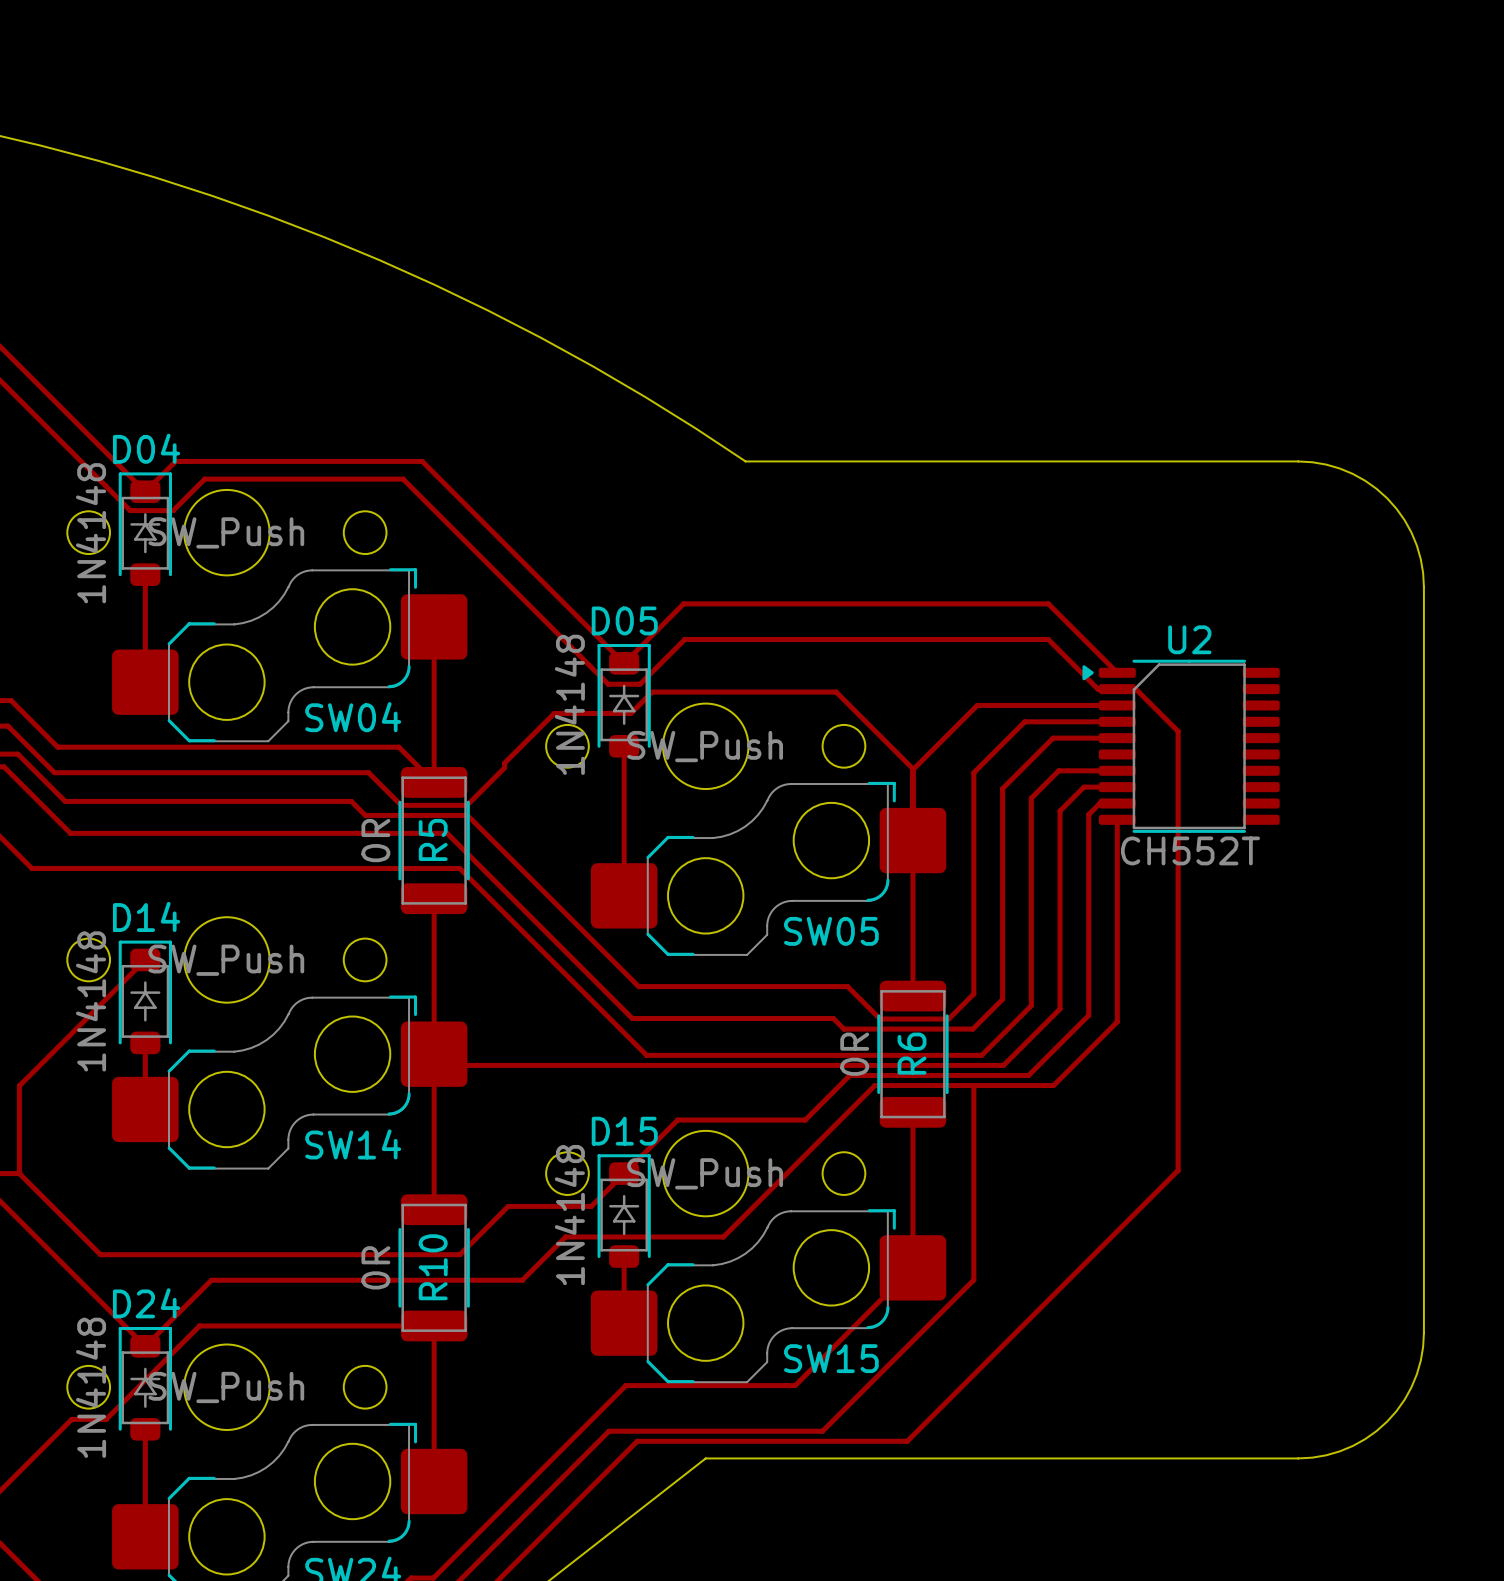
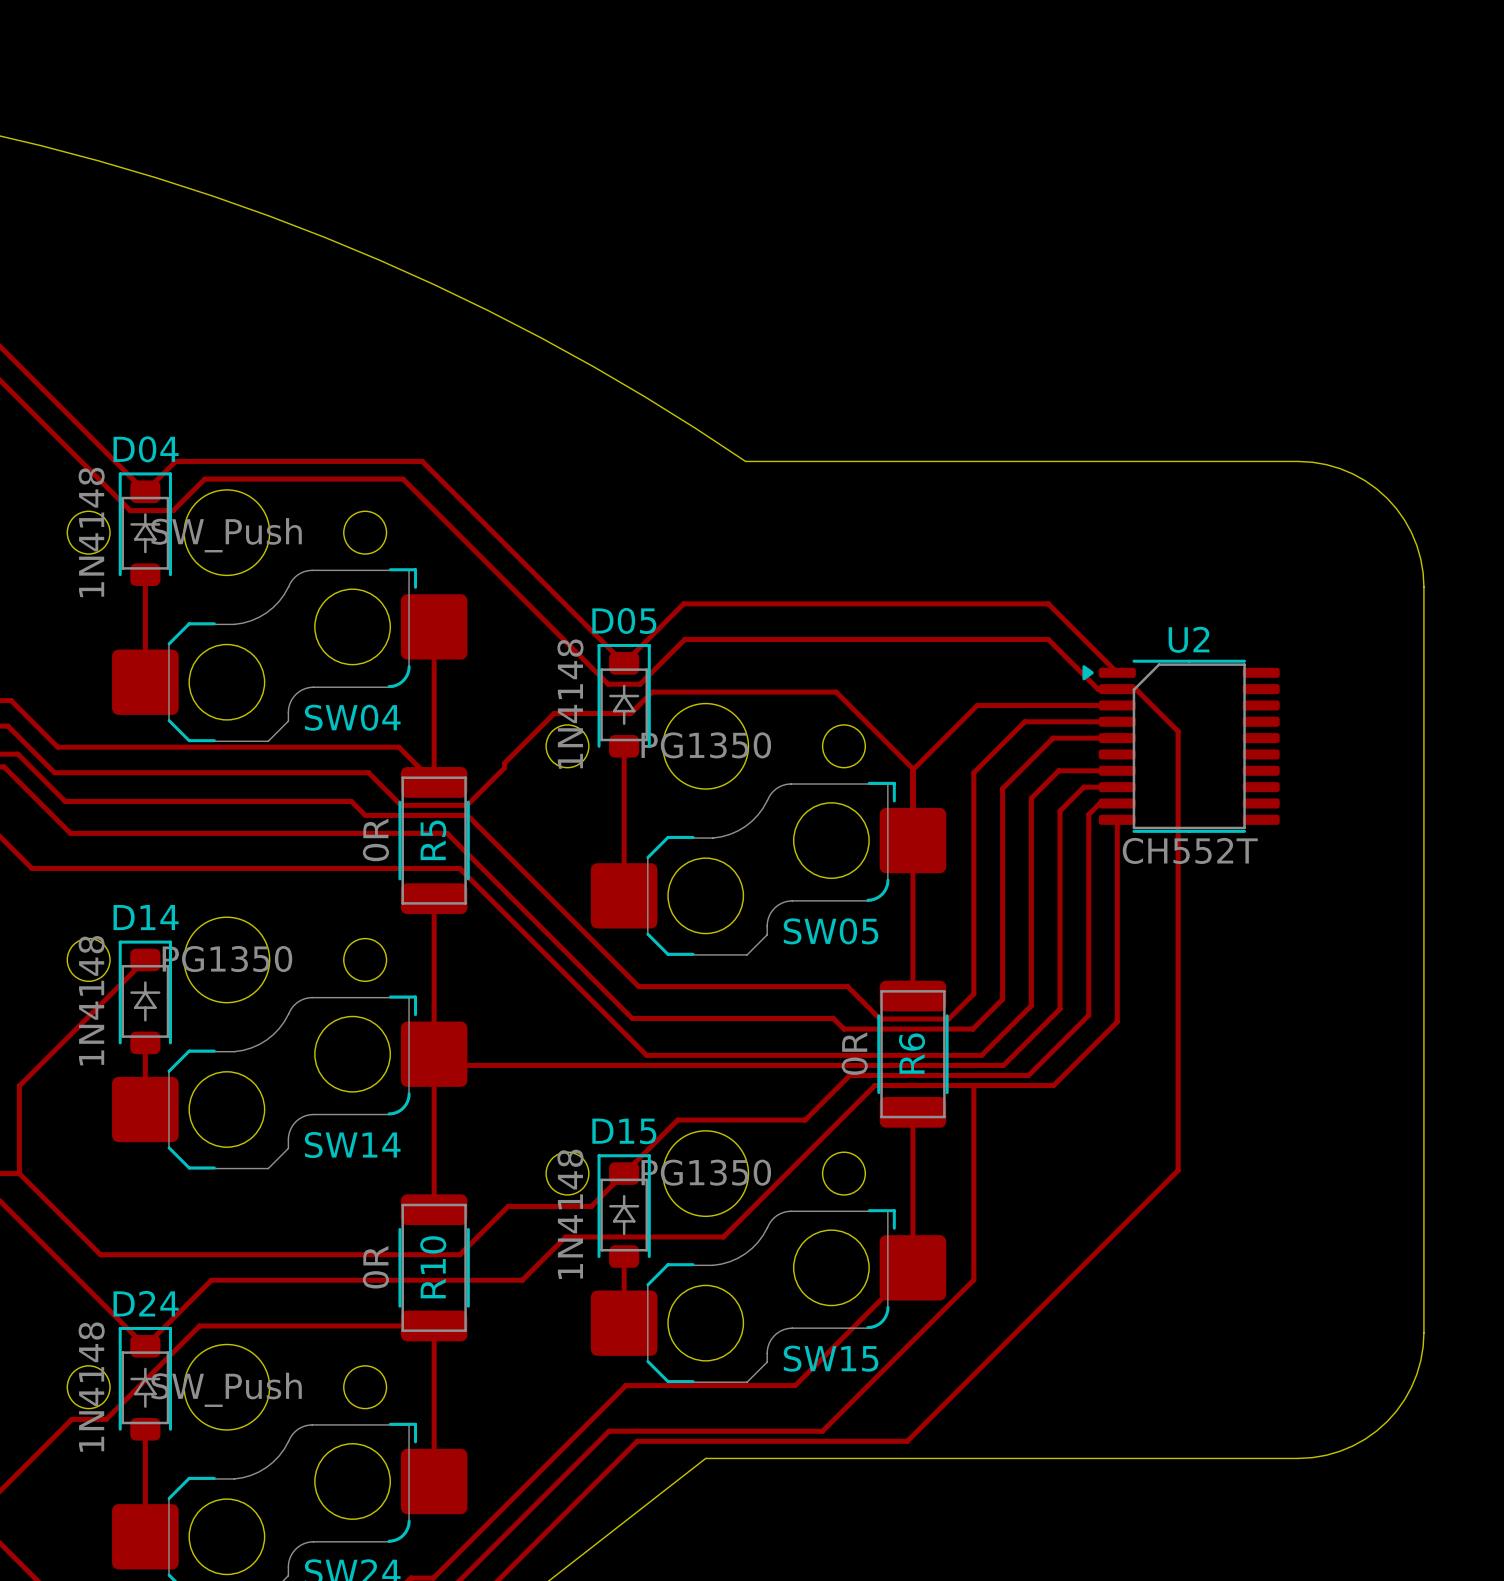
SW05 value: SW_Push (705, 746) -> PG1350 (706, 745)
SW14 value: SW_Push (226, 960) -> PG1350 (227, 959)
SW15 value: SW_Push (705, 1173) -> PG1350 (706, 1172)

